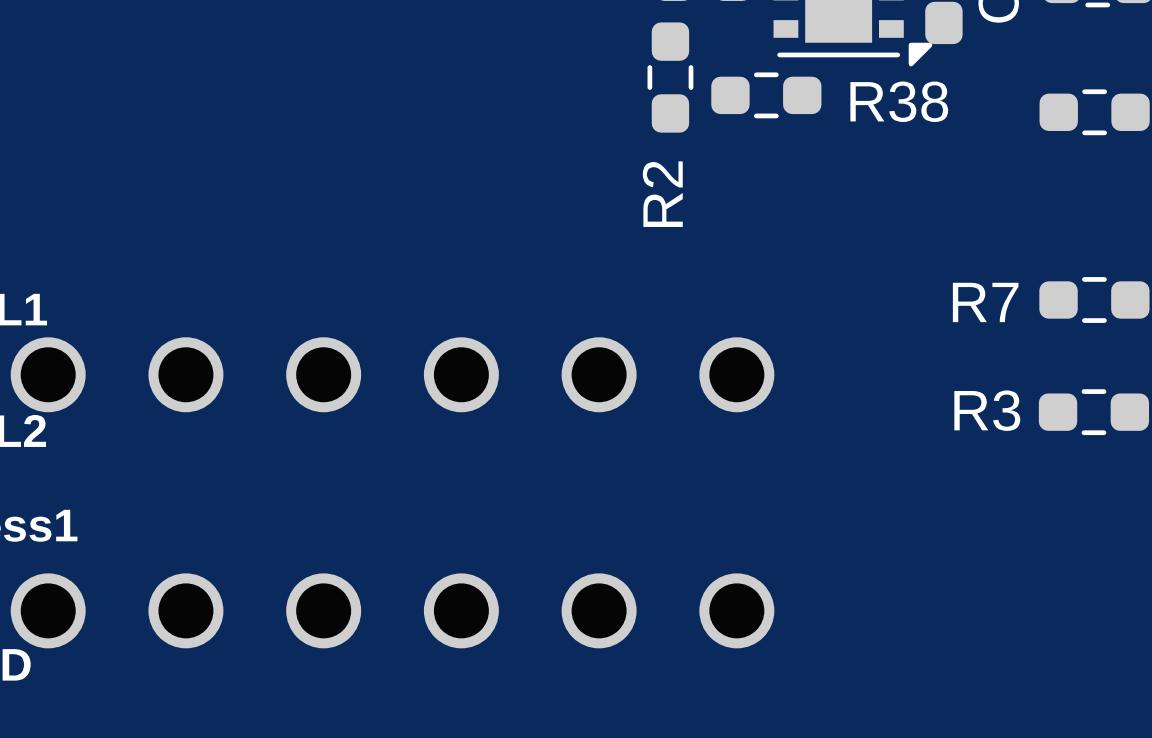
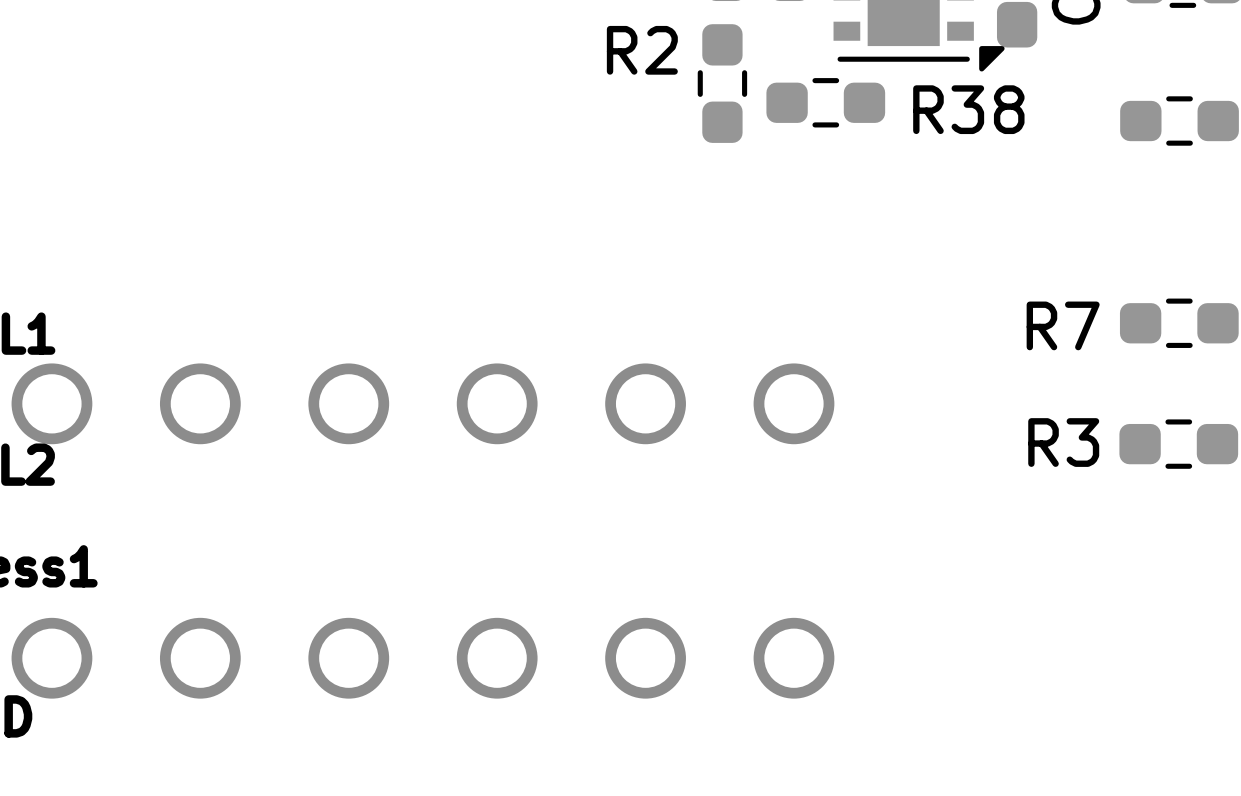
R2 name rotation: 0° (662, 194) -> 90° clockwise (642, 50)
R2 name position: R2 (662, 194) -> R2 (642, 50)

